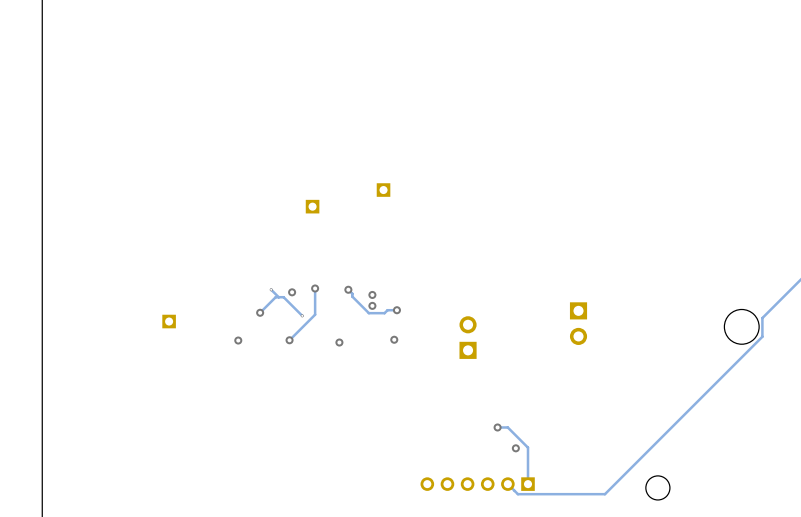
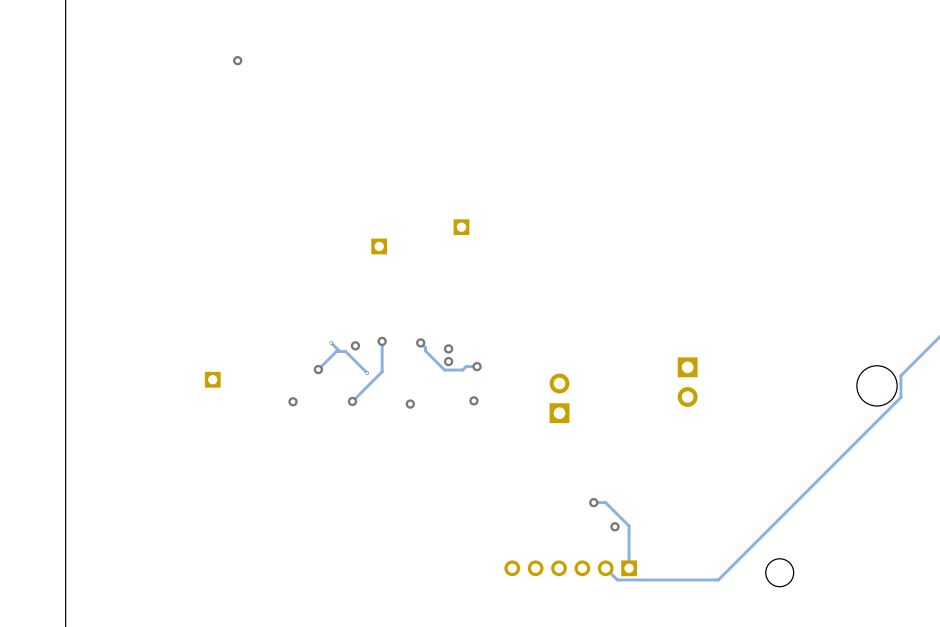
via: none -> (237, 60)

